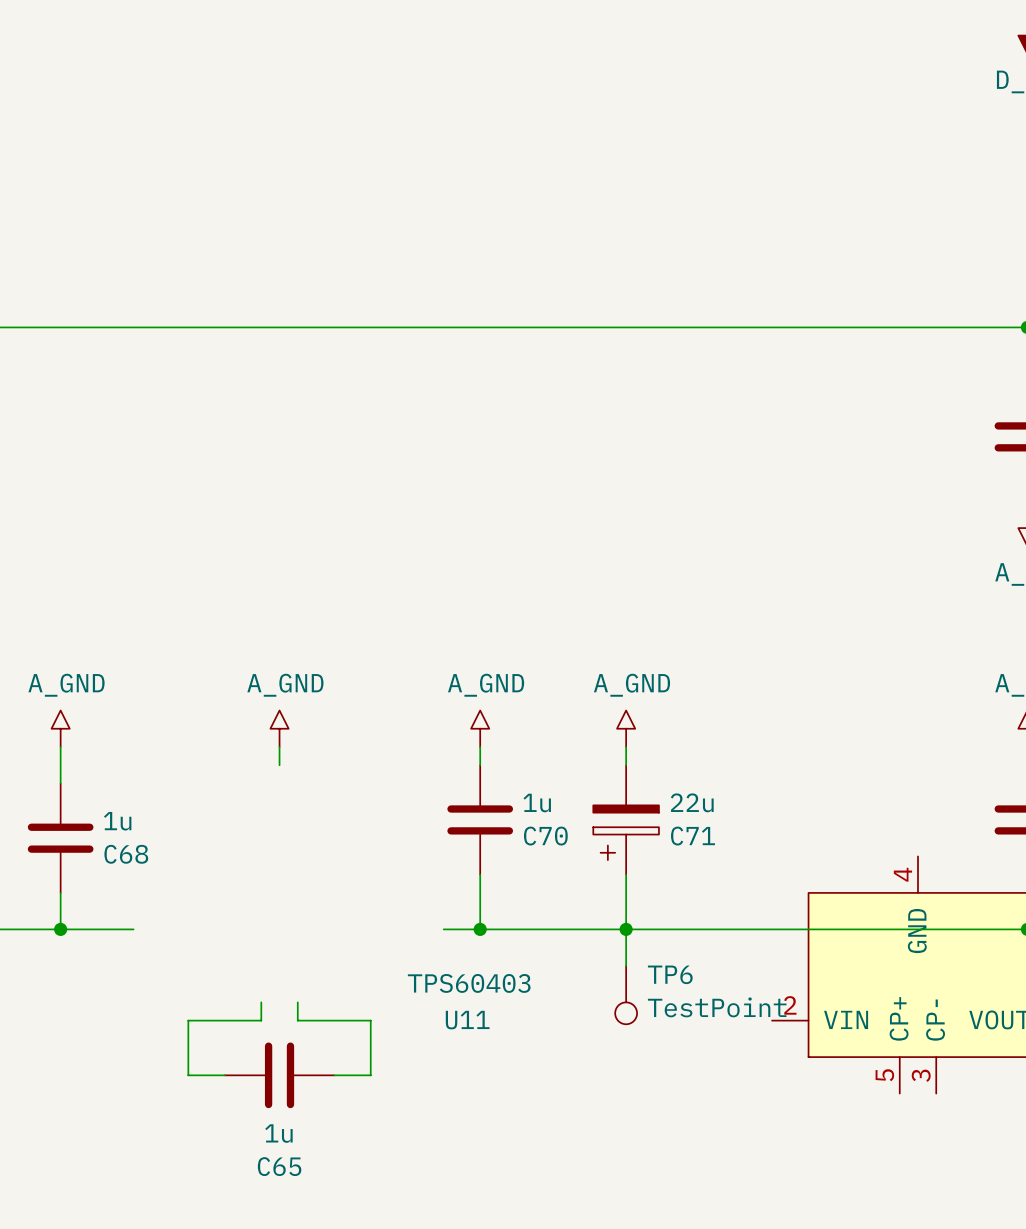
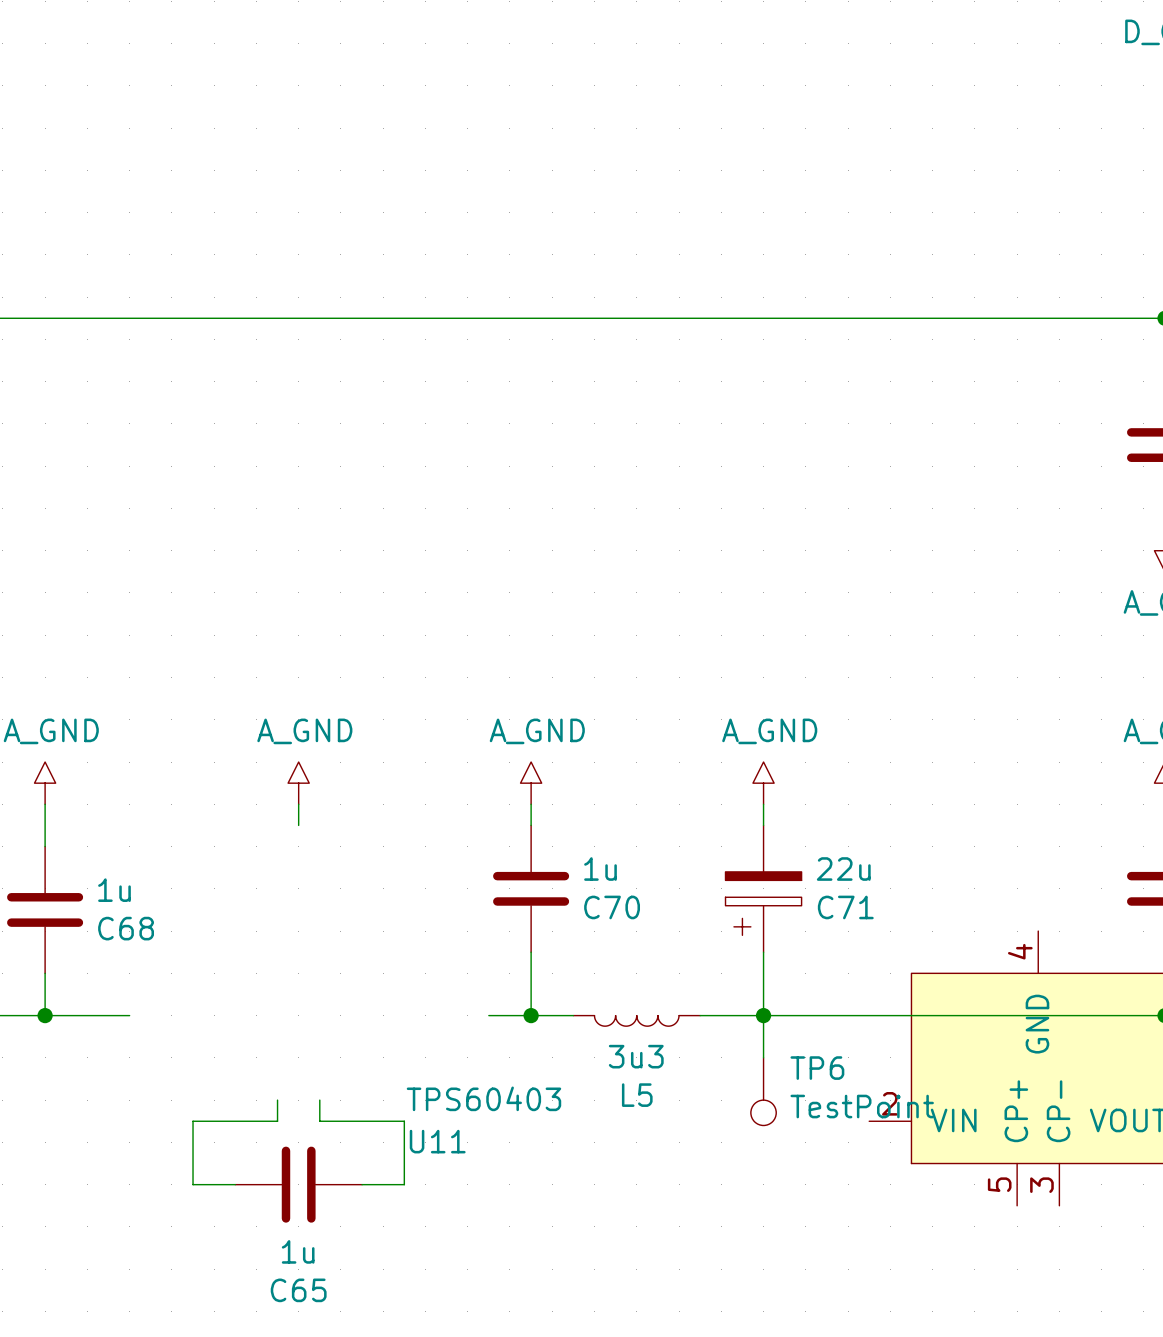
power symbol position: A_GND (626, 728) -> A_GND (763, 783)
wire: (626, 746) (626, 765) -> (763, 804) (763, 825)
C71 position: (626, 819) -> (763, 888)
wire: (626, 874) (626, 965) -> (763, 952) (763, 1057)
wire: (516, 929) (626, 929) -> none
junction position: (626, 929) -> (763, 1015)
L5: none -> 3u3 (636, 1020)
U11 value position: TPS60403 (469, 983) -> TPS60403 (483, 1098)
TP6 position: (626, 995) -> (763, 1091)
U11 name position: U11 (467, 1020) -> U11 (437, 1141)

